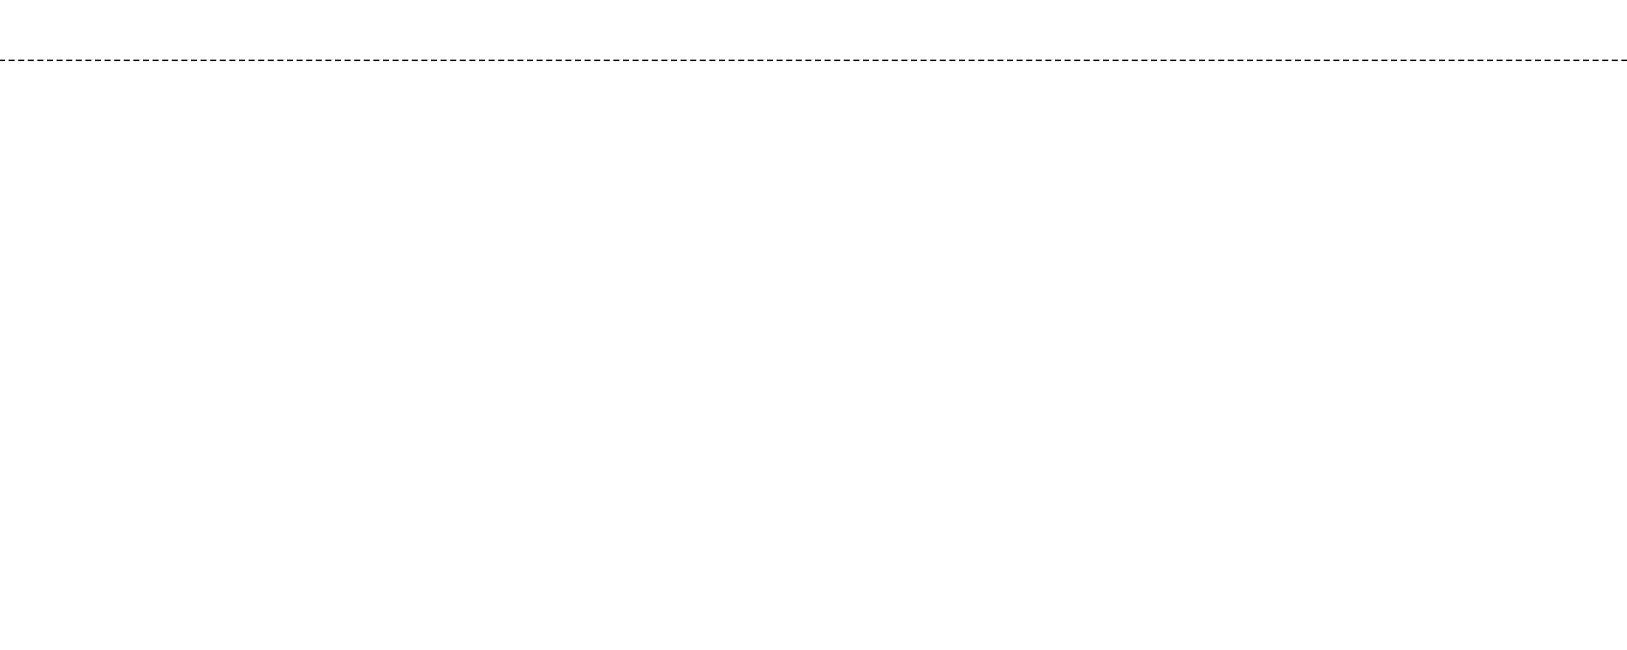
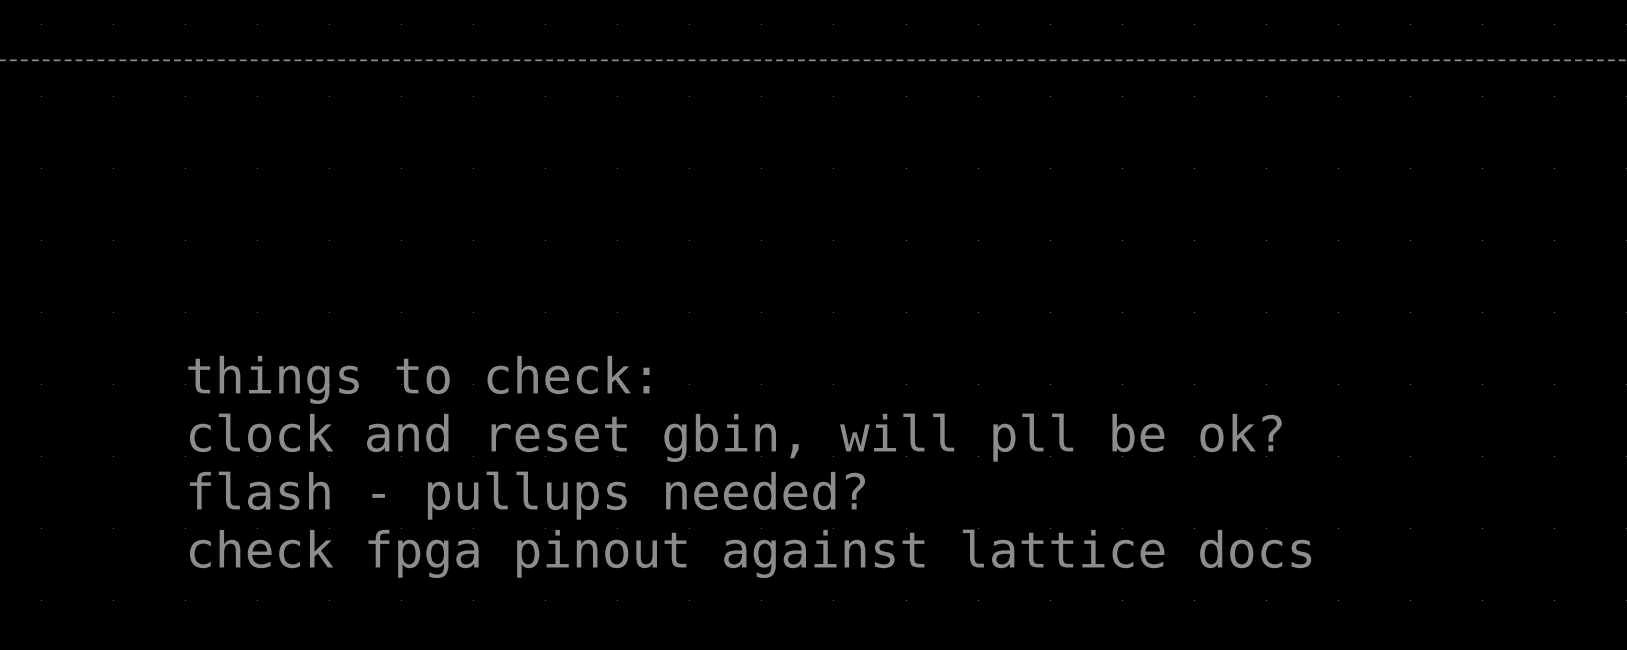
text: none -> things to check: (418, 379)
text: none -> clock and reset gbin, will pll be ok? (735, 437)
text: none -> flash - pullups needed? (527, 495)
text: none -> check fpga pinout against lattice docs (750, 553)

